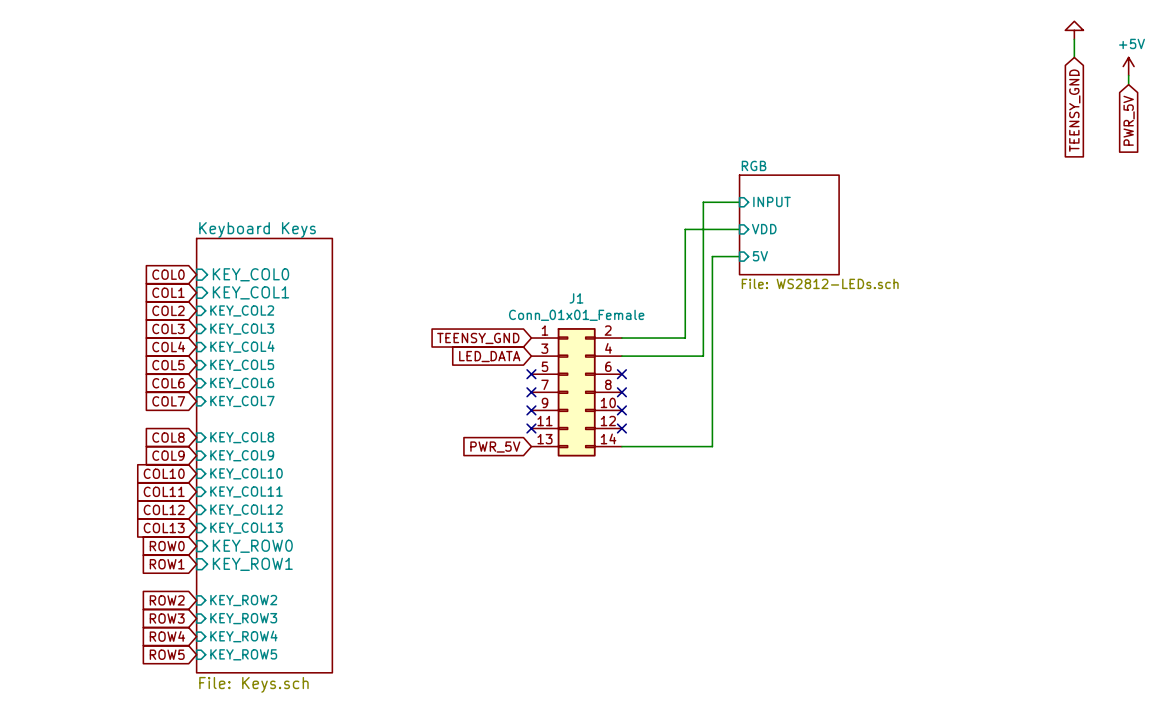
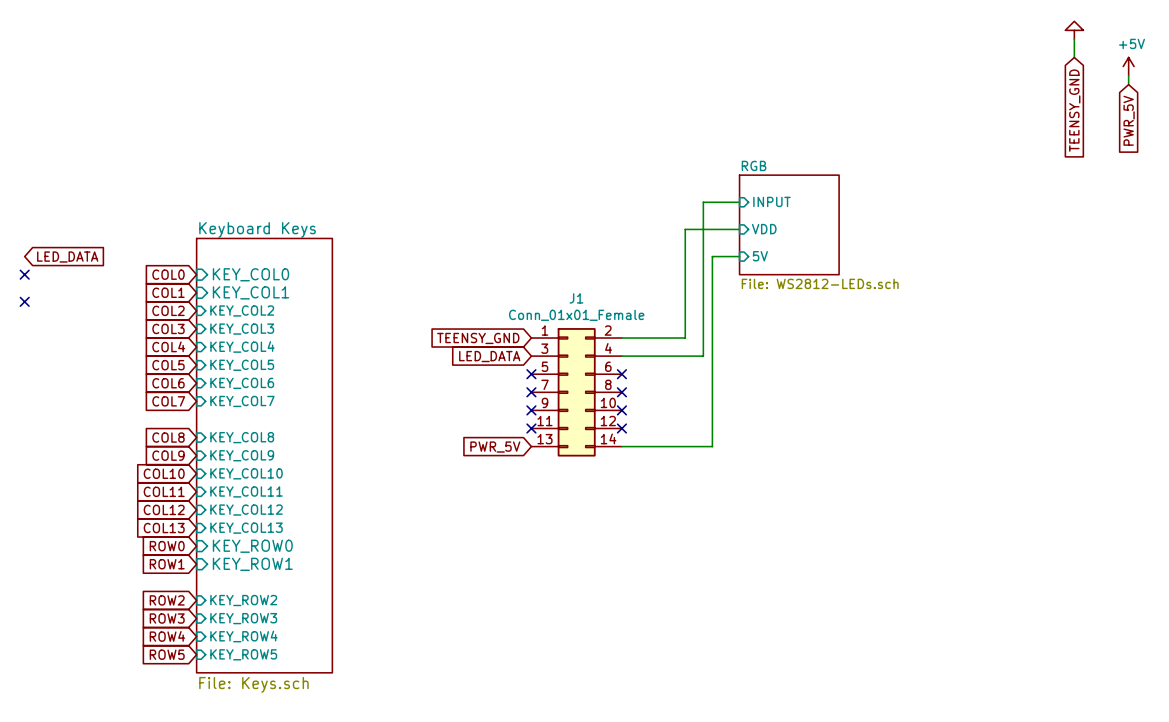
global label: none -> LED_DATA (67, 257)
no-connect mark: none -> (24, 274)
no-connect mark: none -> (24, 301)

